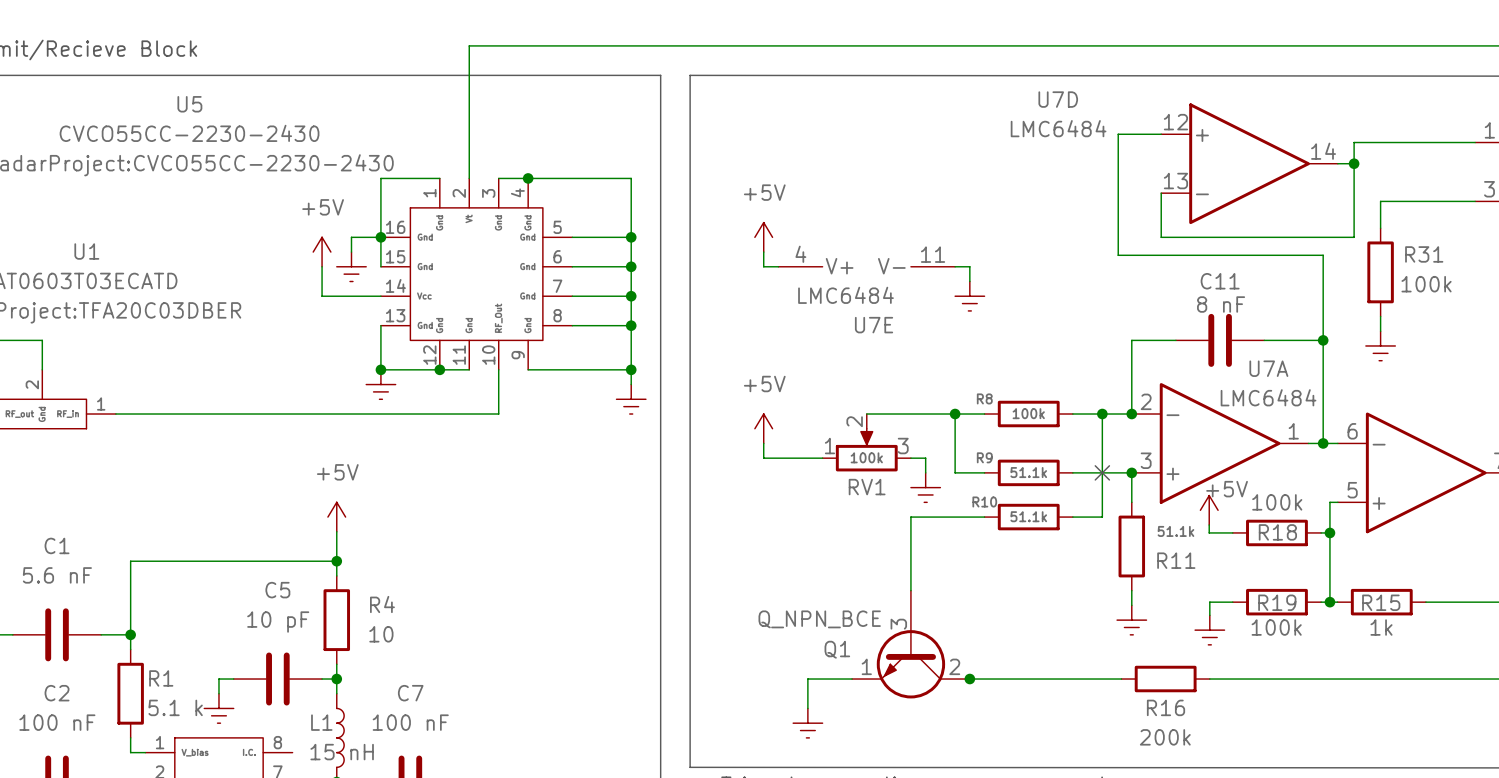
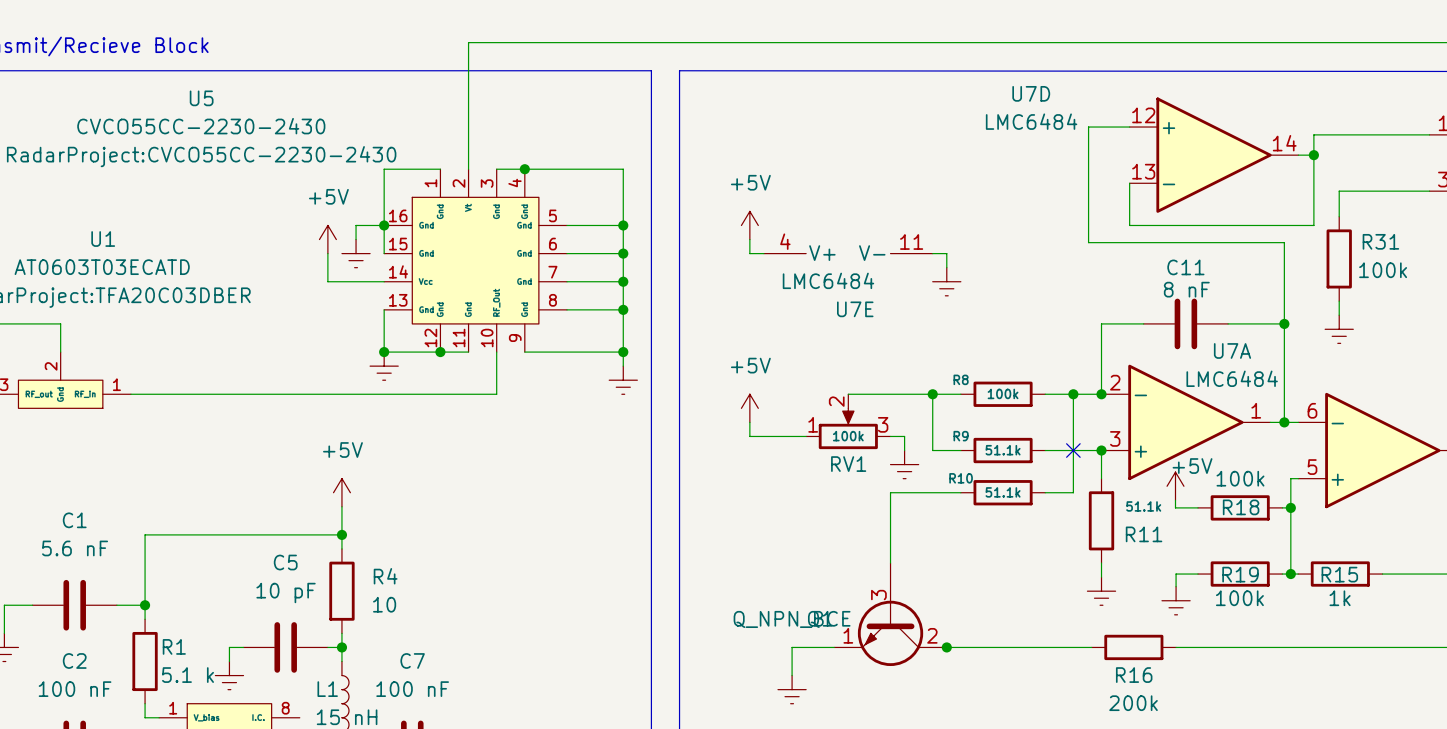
Q1 value position: Q_NPN_BCE (819, 619) -> Q_NPN_BCE (792, 619)

